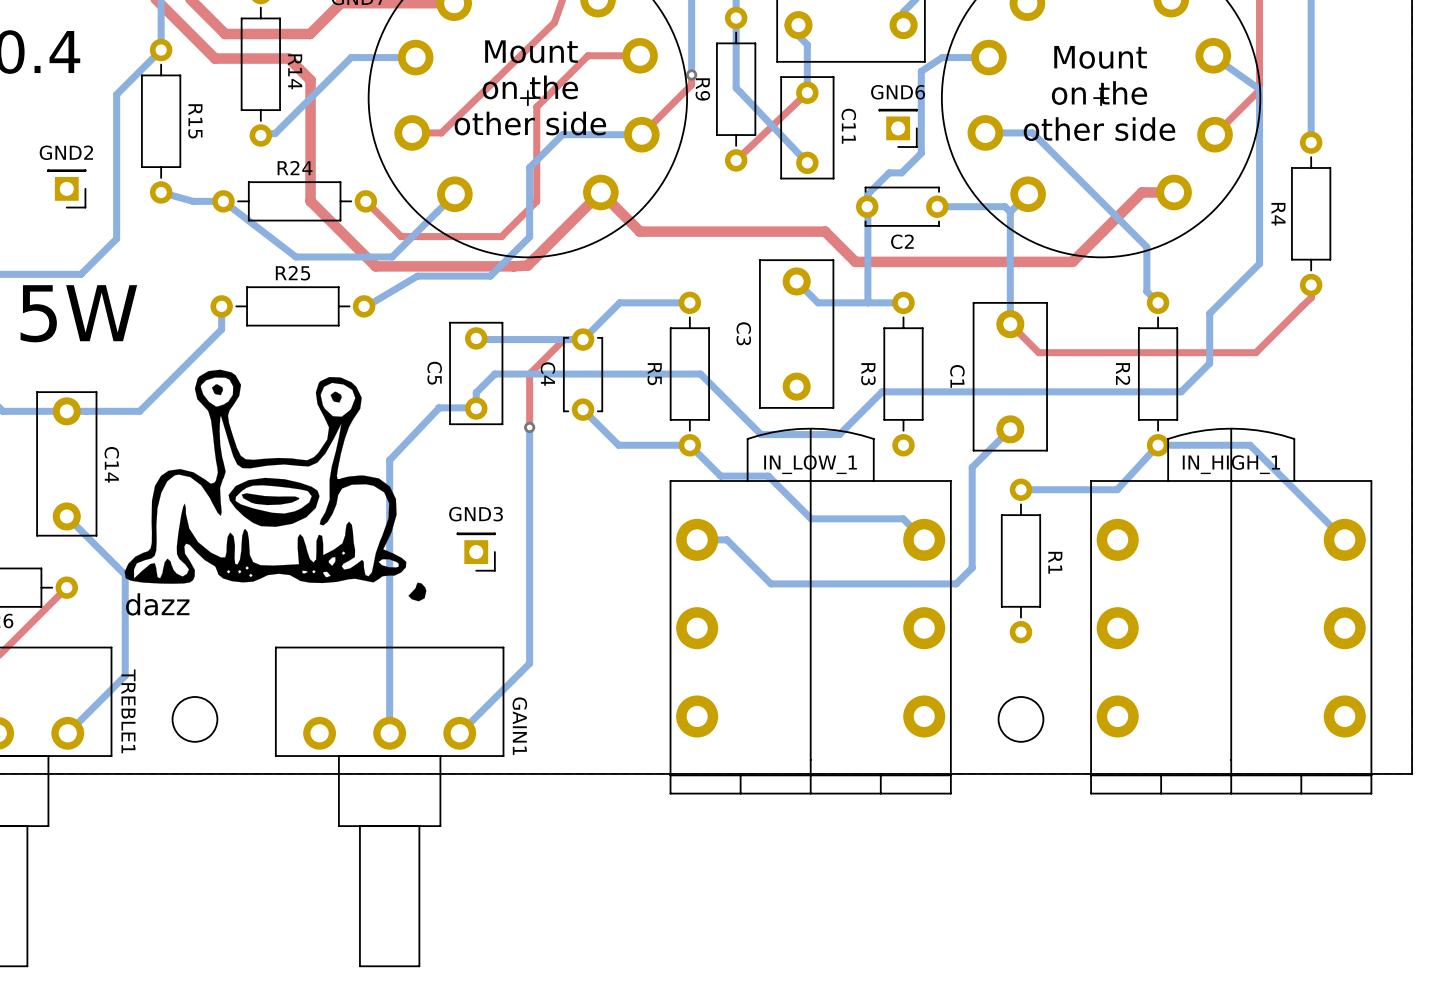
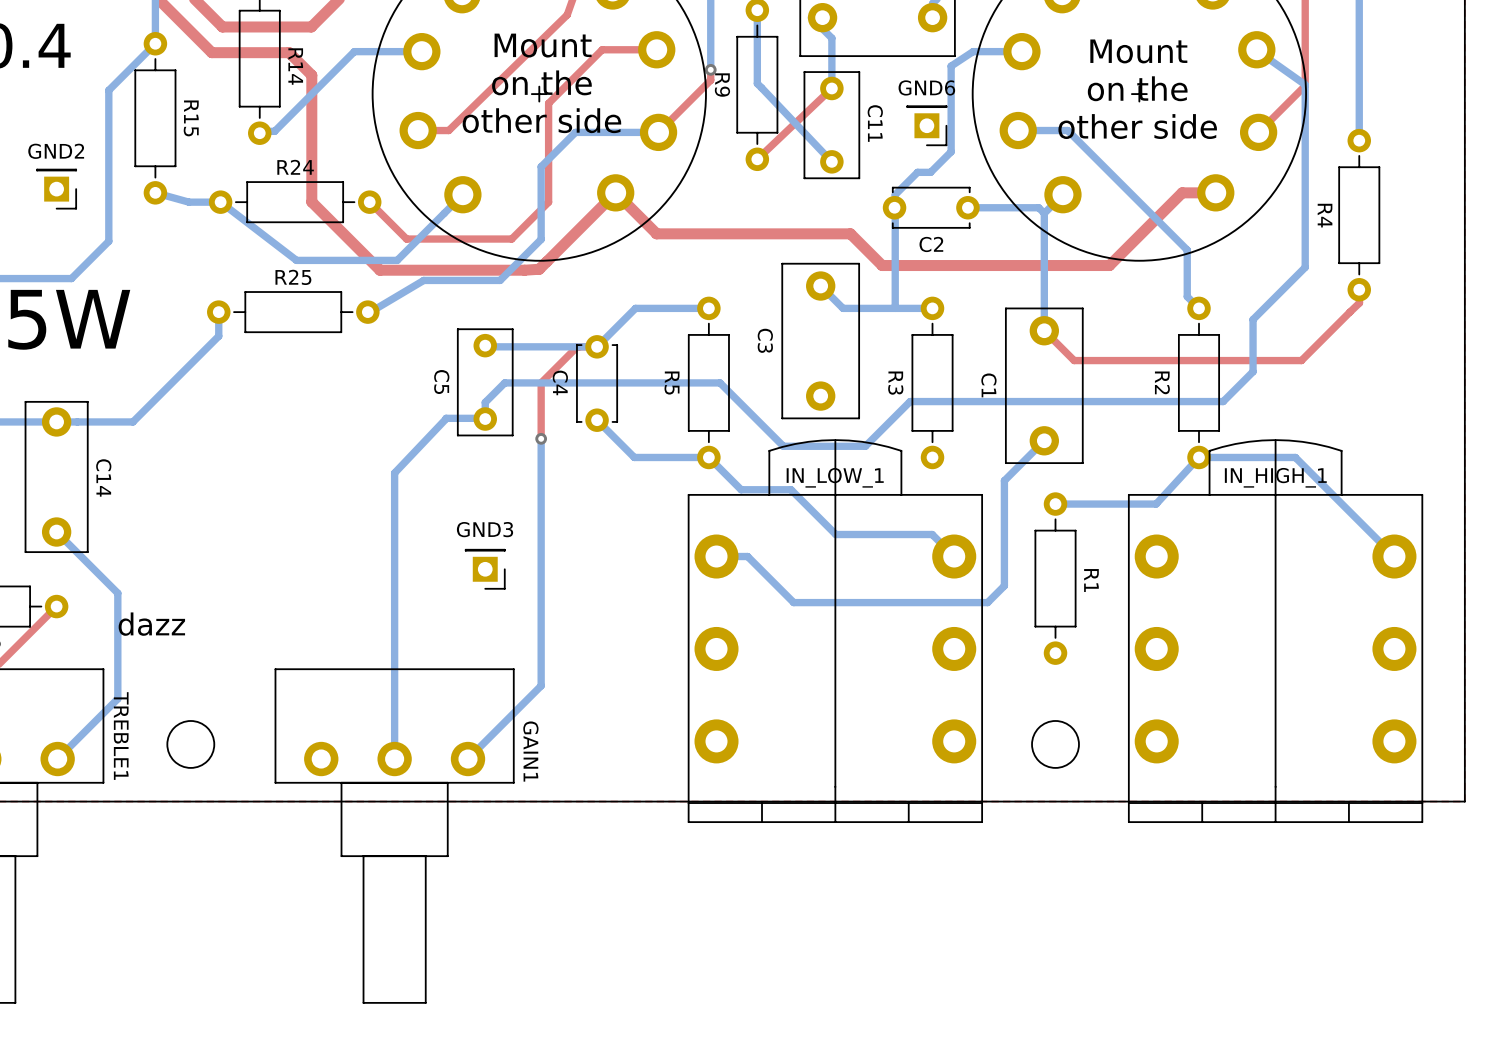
drawing: [124, 369, 427, 602] -> none

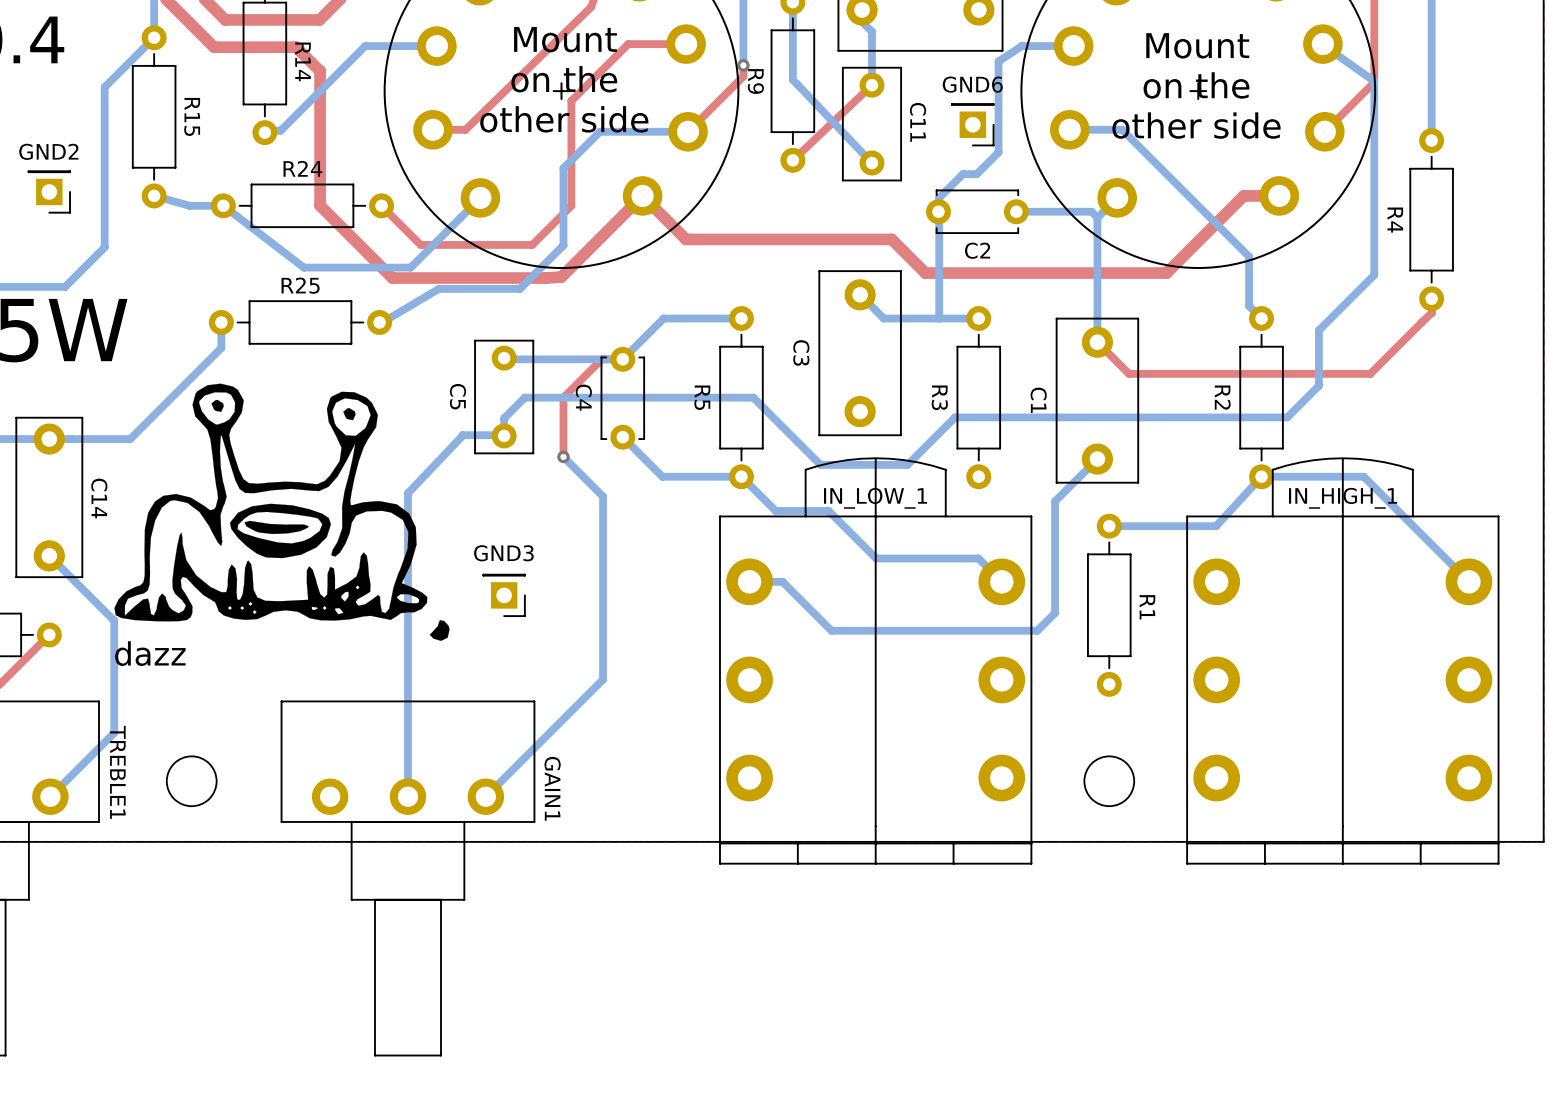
drawing: none -> [114, 383, 450, 641]
bottom track: (541, 438) (541, 685) -> (563, 456) (603, 496) (603, 679) (563, 719)

